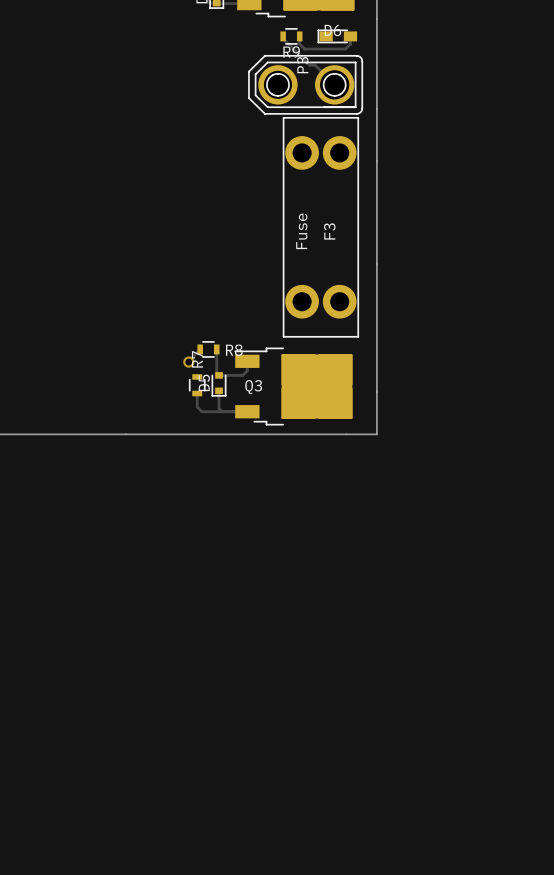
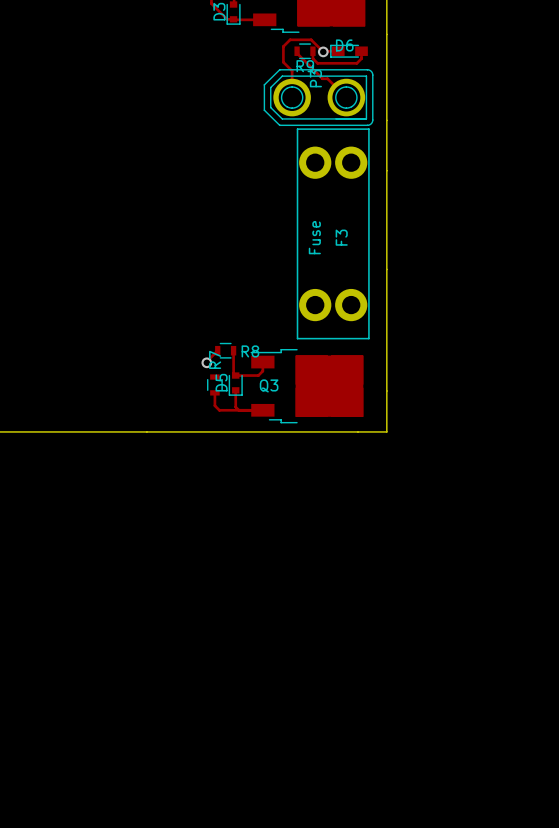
track: none -> (338, 51) (323, 51) (311, 39) (290, 39) (283, 46) (283, 62) (292, 70) (292, 97)
via: none -> (323, 51)

